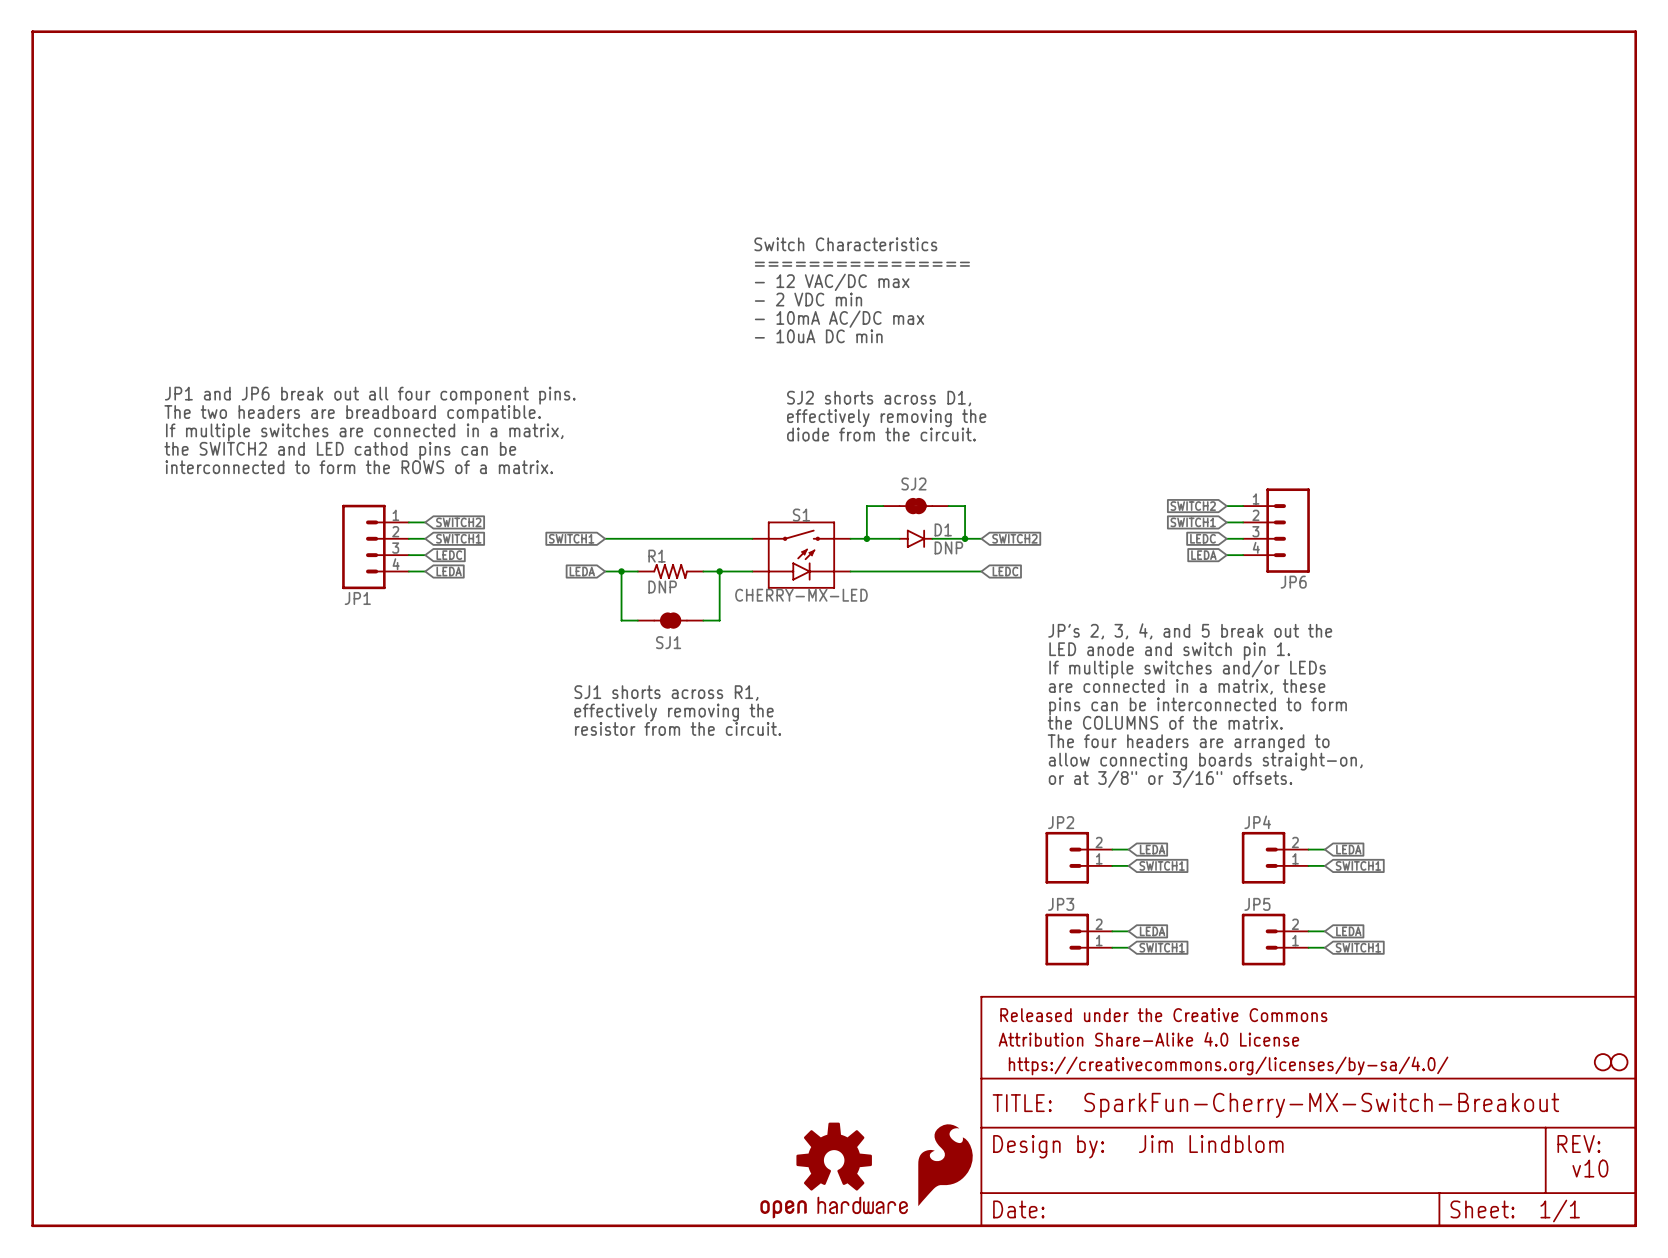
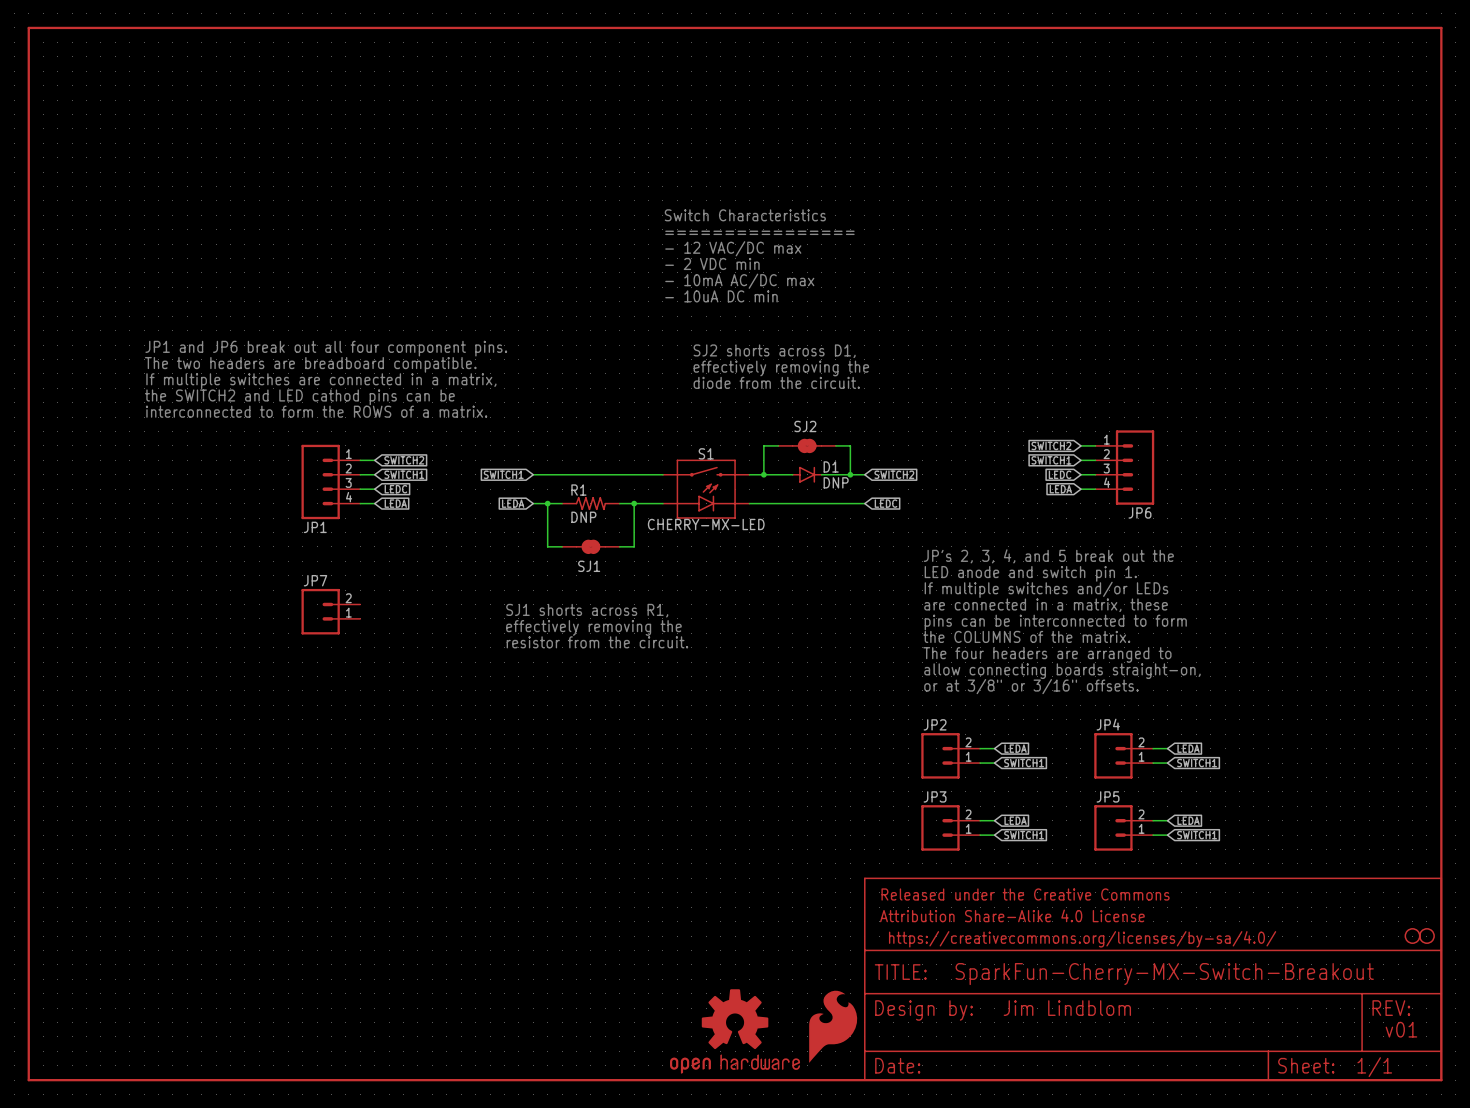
JP7: none -> (330, 611)
text: v10 (1590, 1168) -> v01 (1401, 1029)

